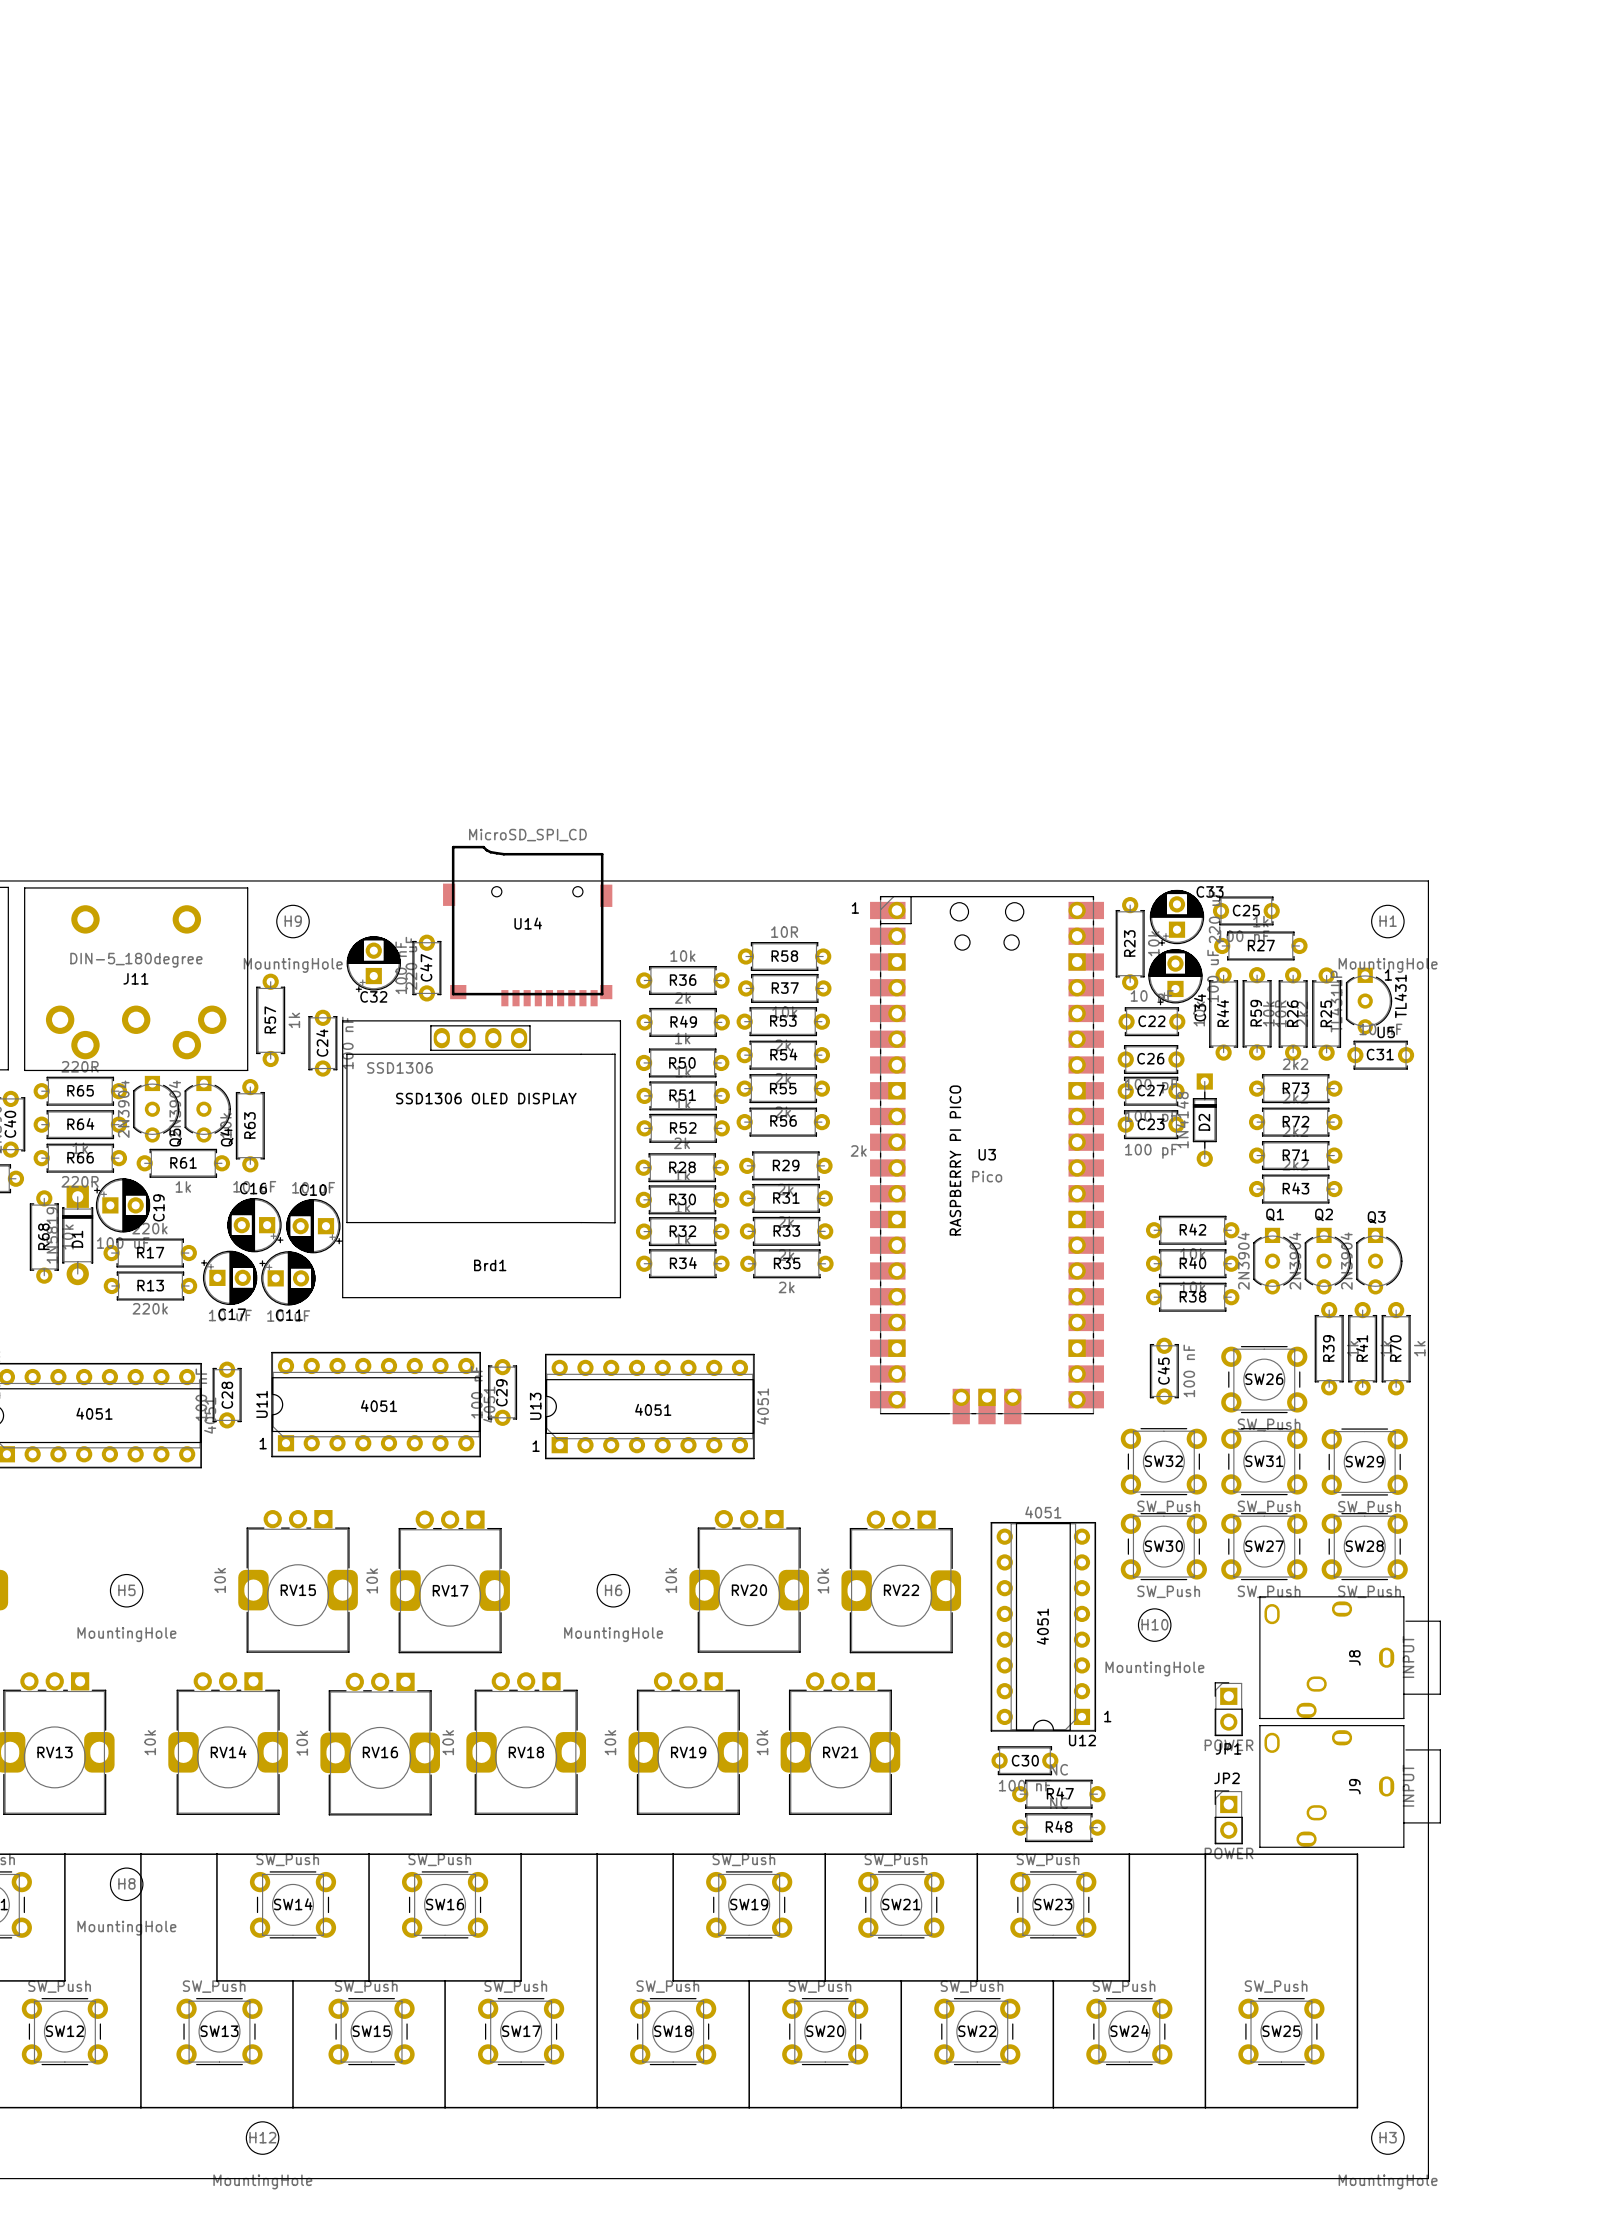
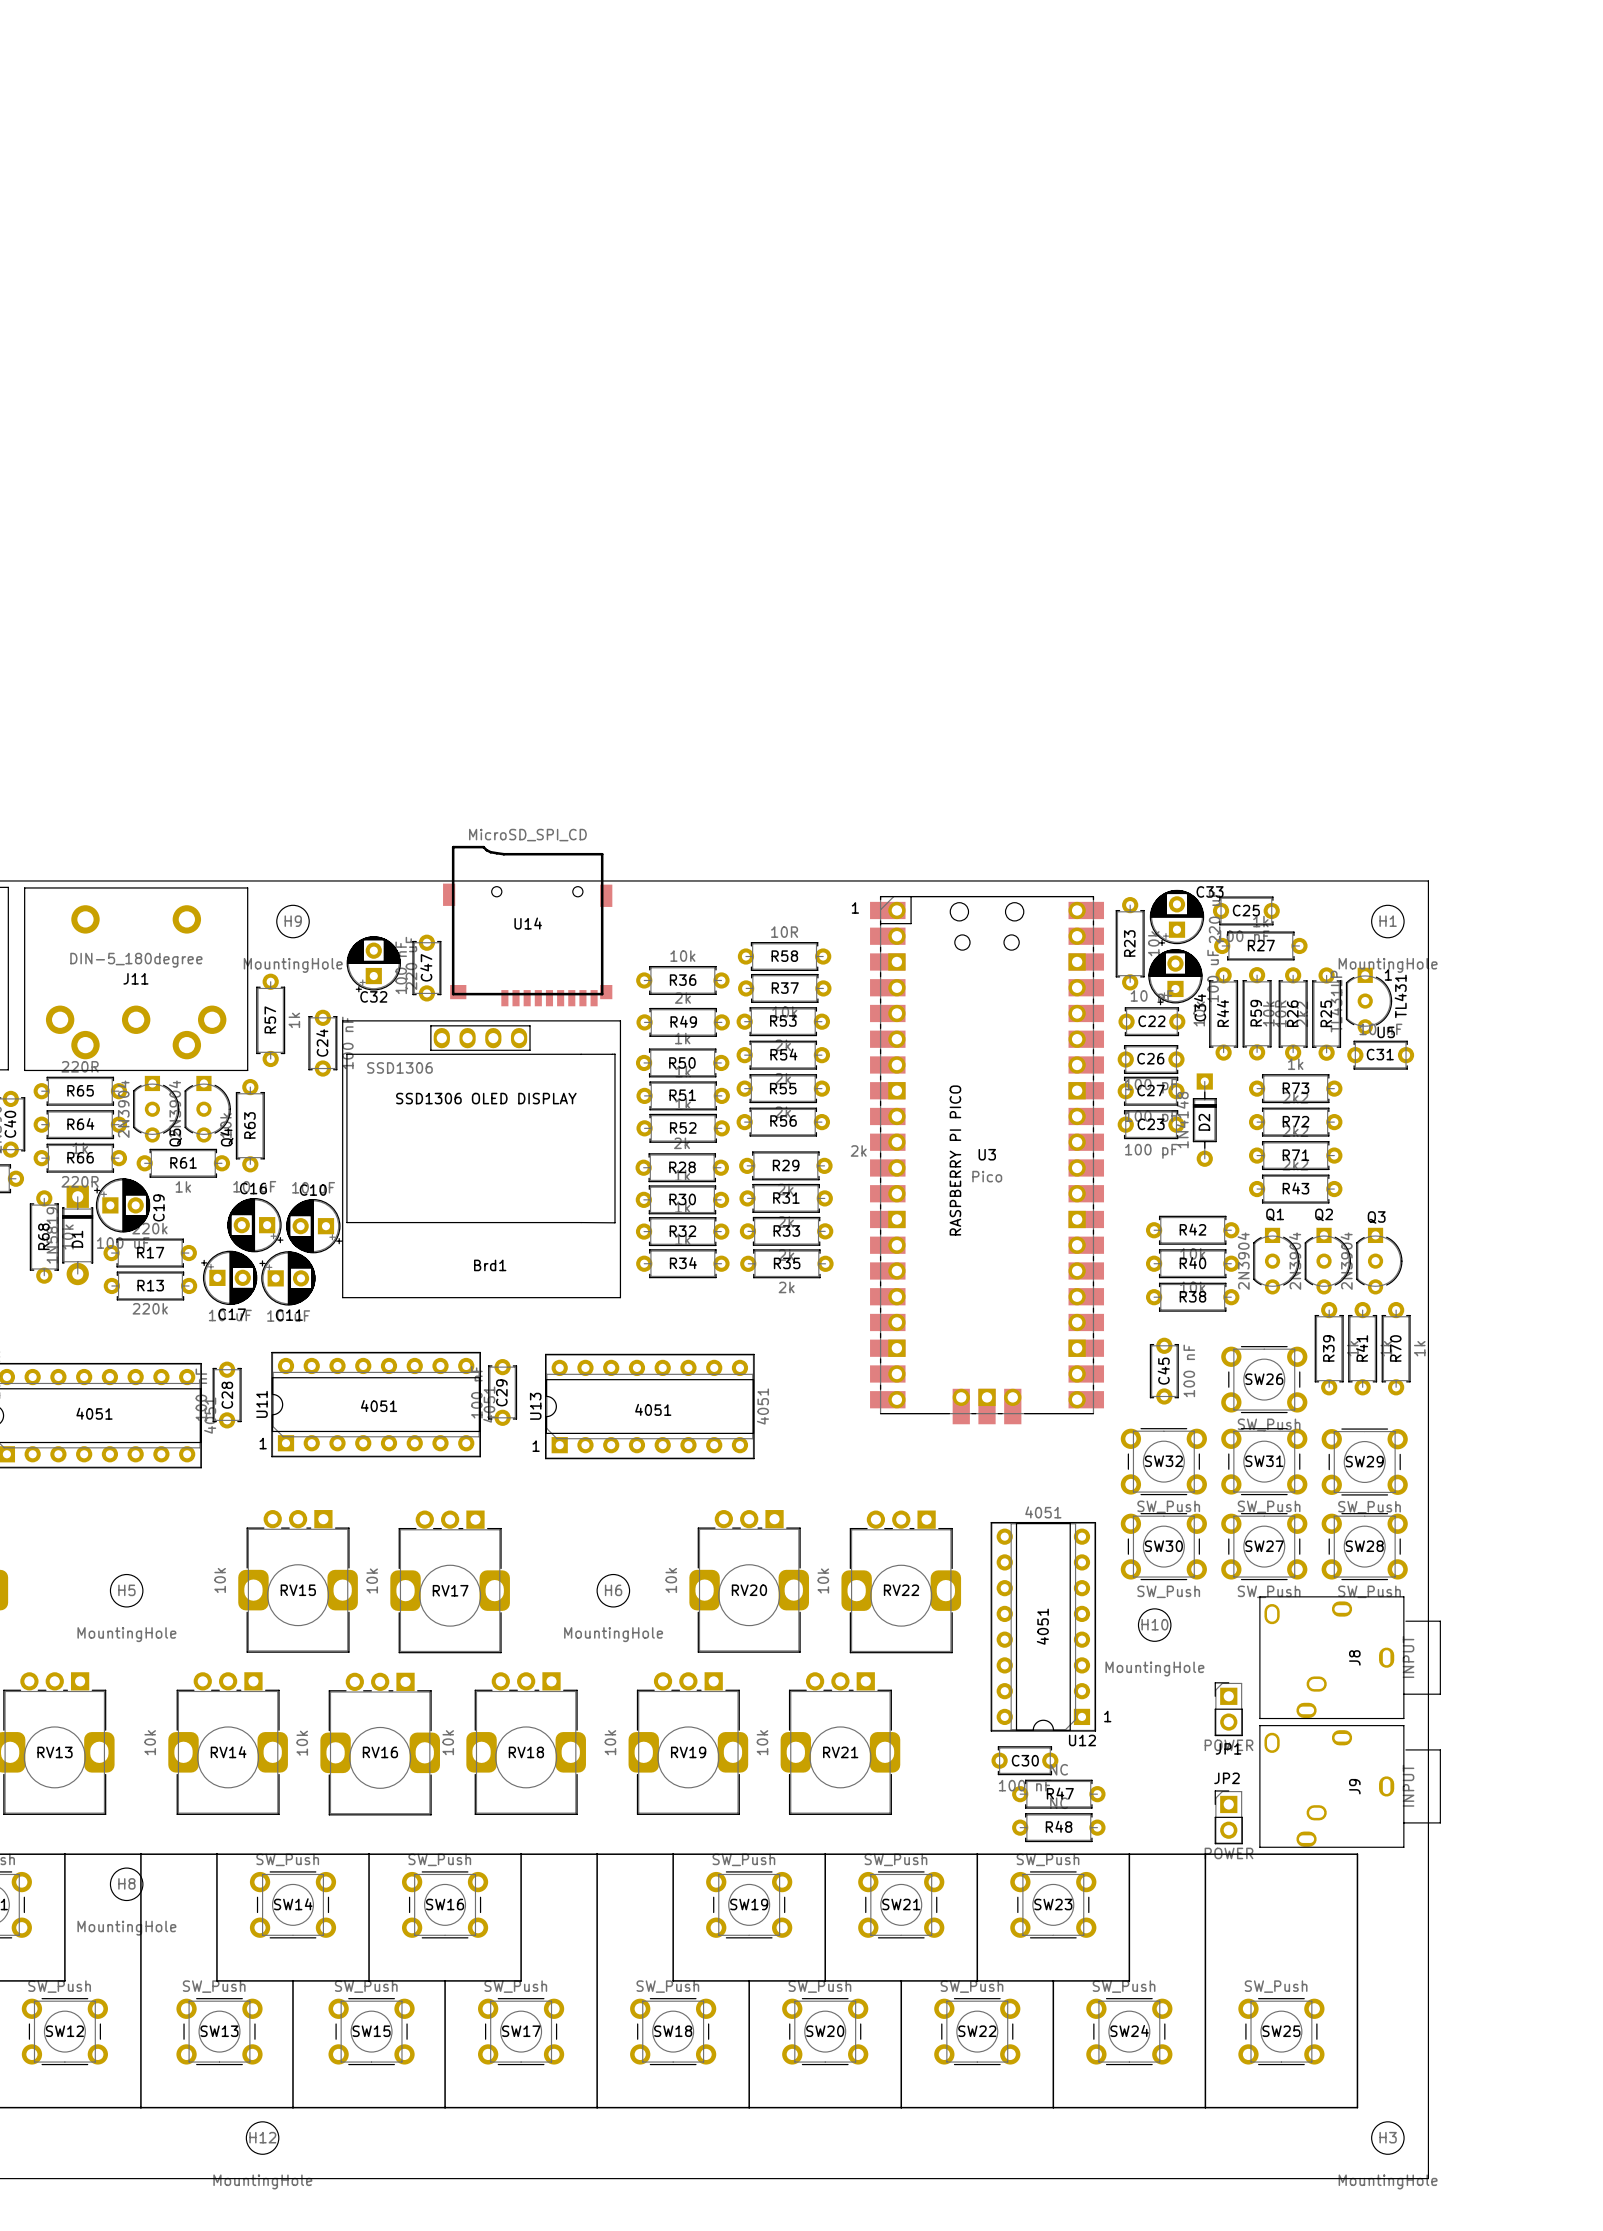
R73 value: 2k2 (1295, 1064) -> 1k (1295, 1064)

